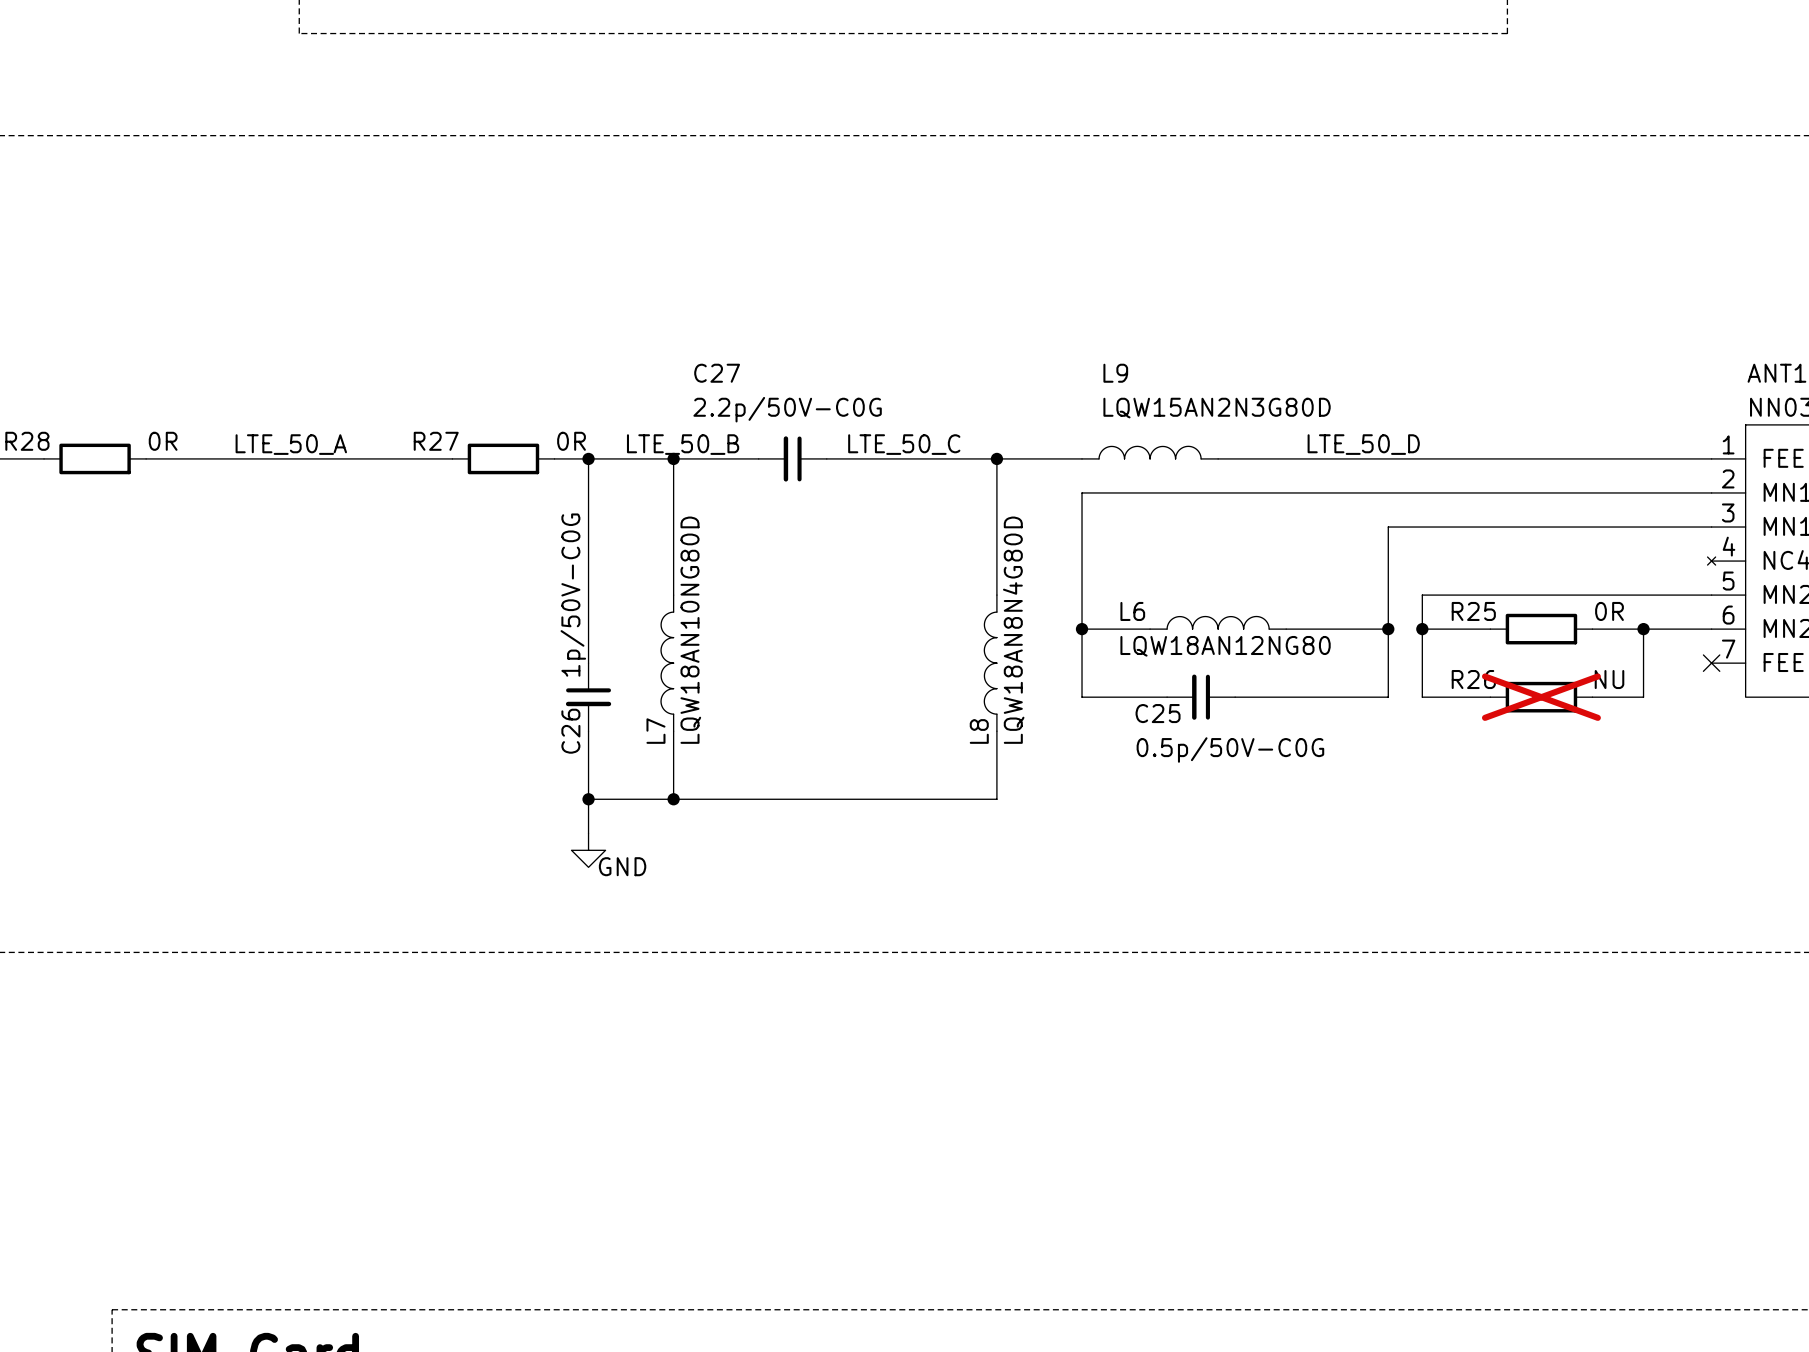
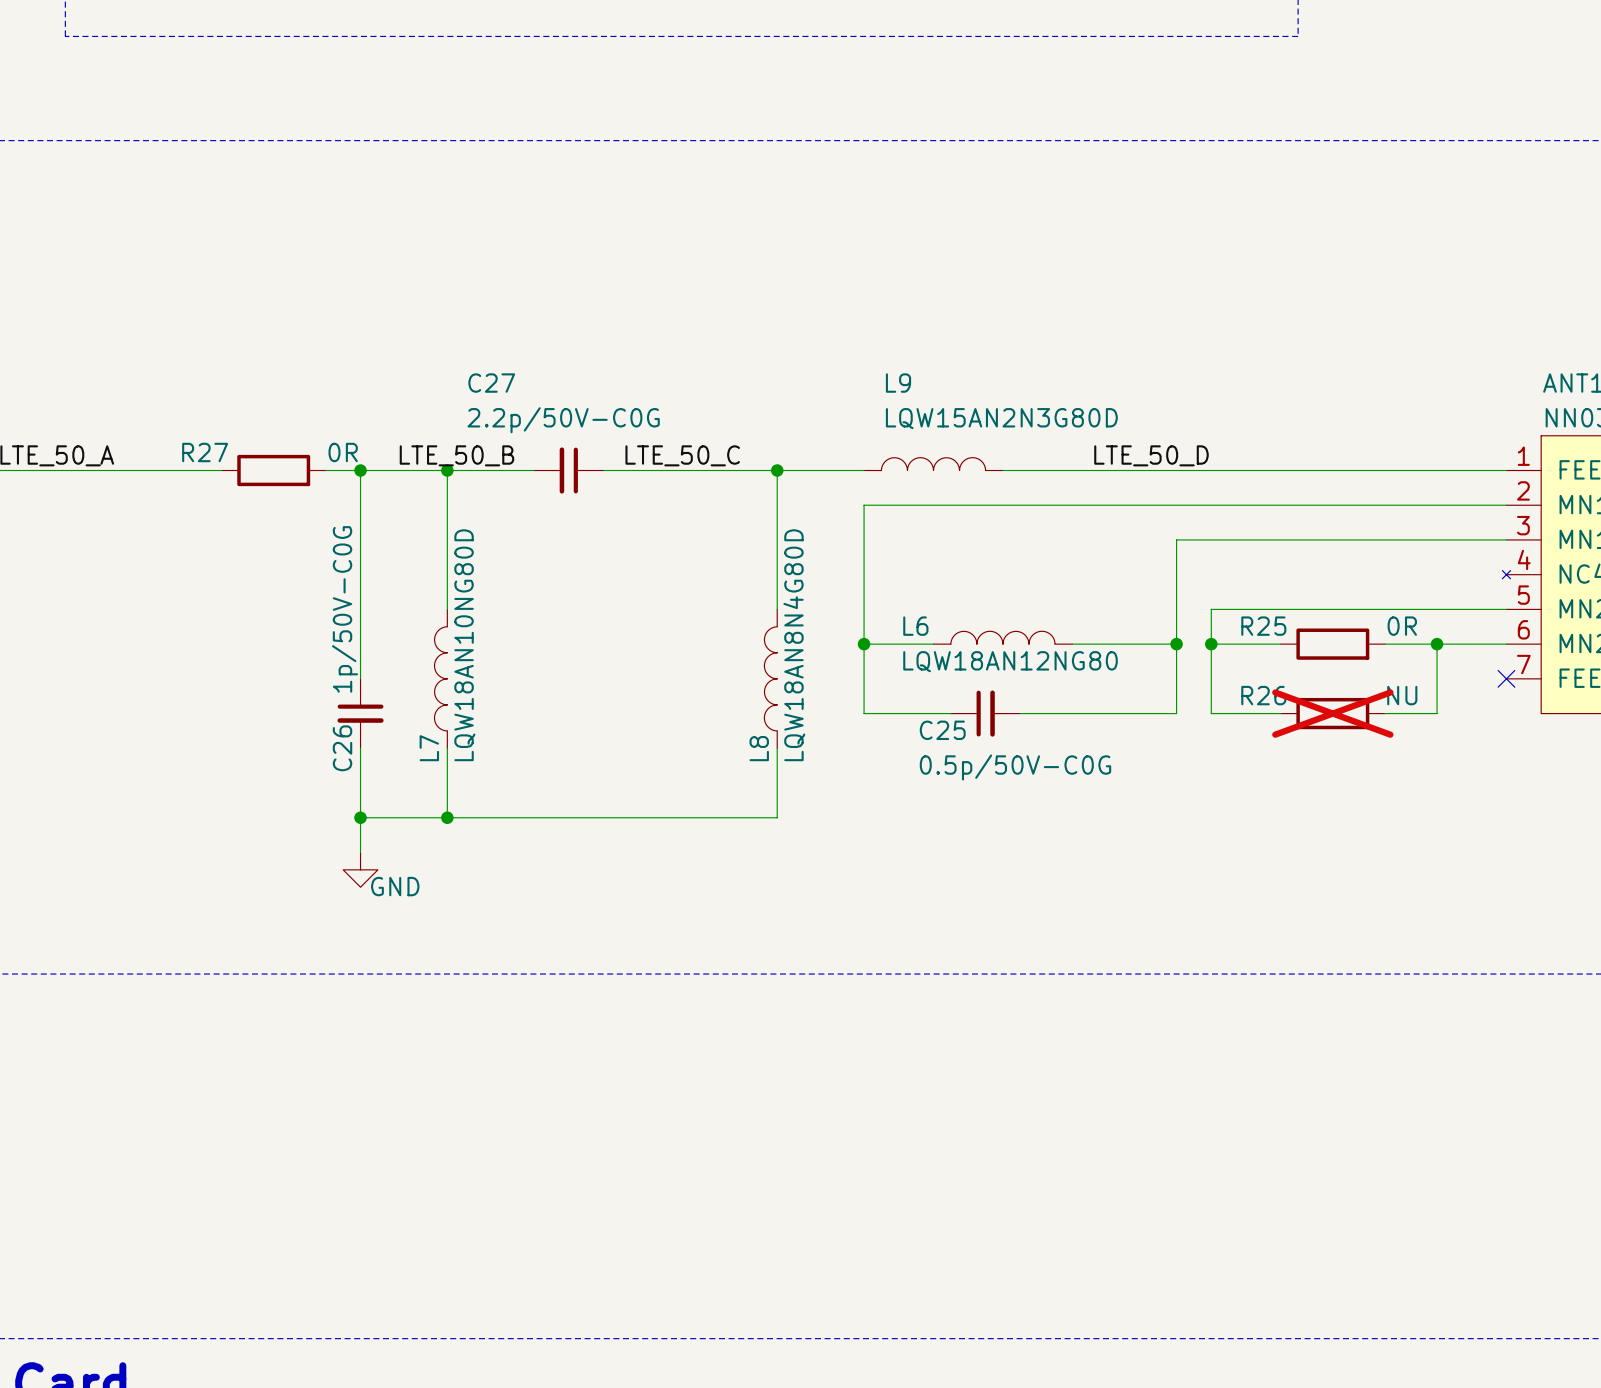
C25 rotation: 0° (1201, 697) -> 180° (985, 713)

